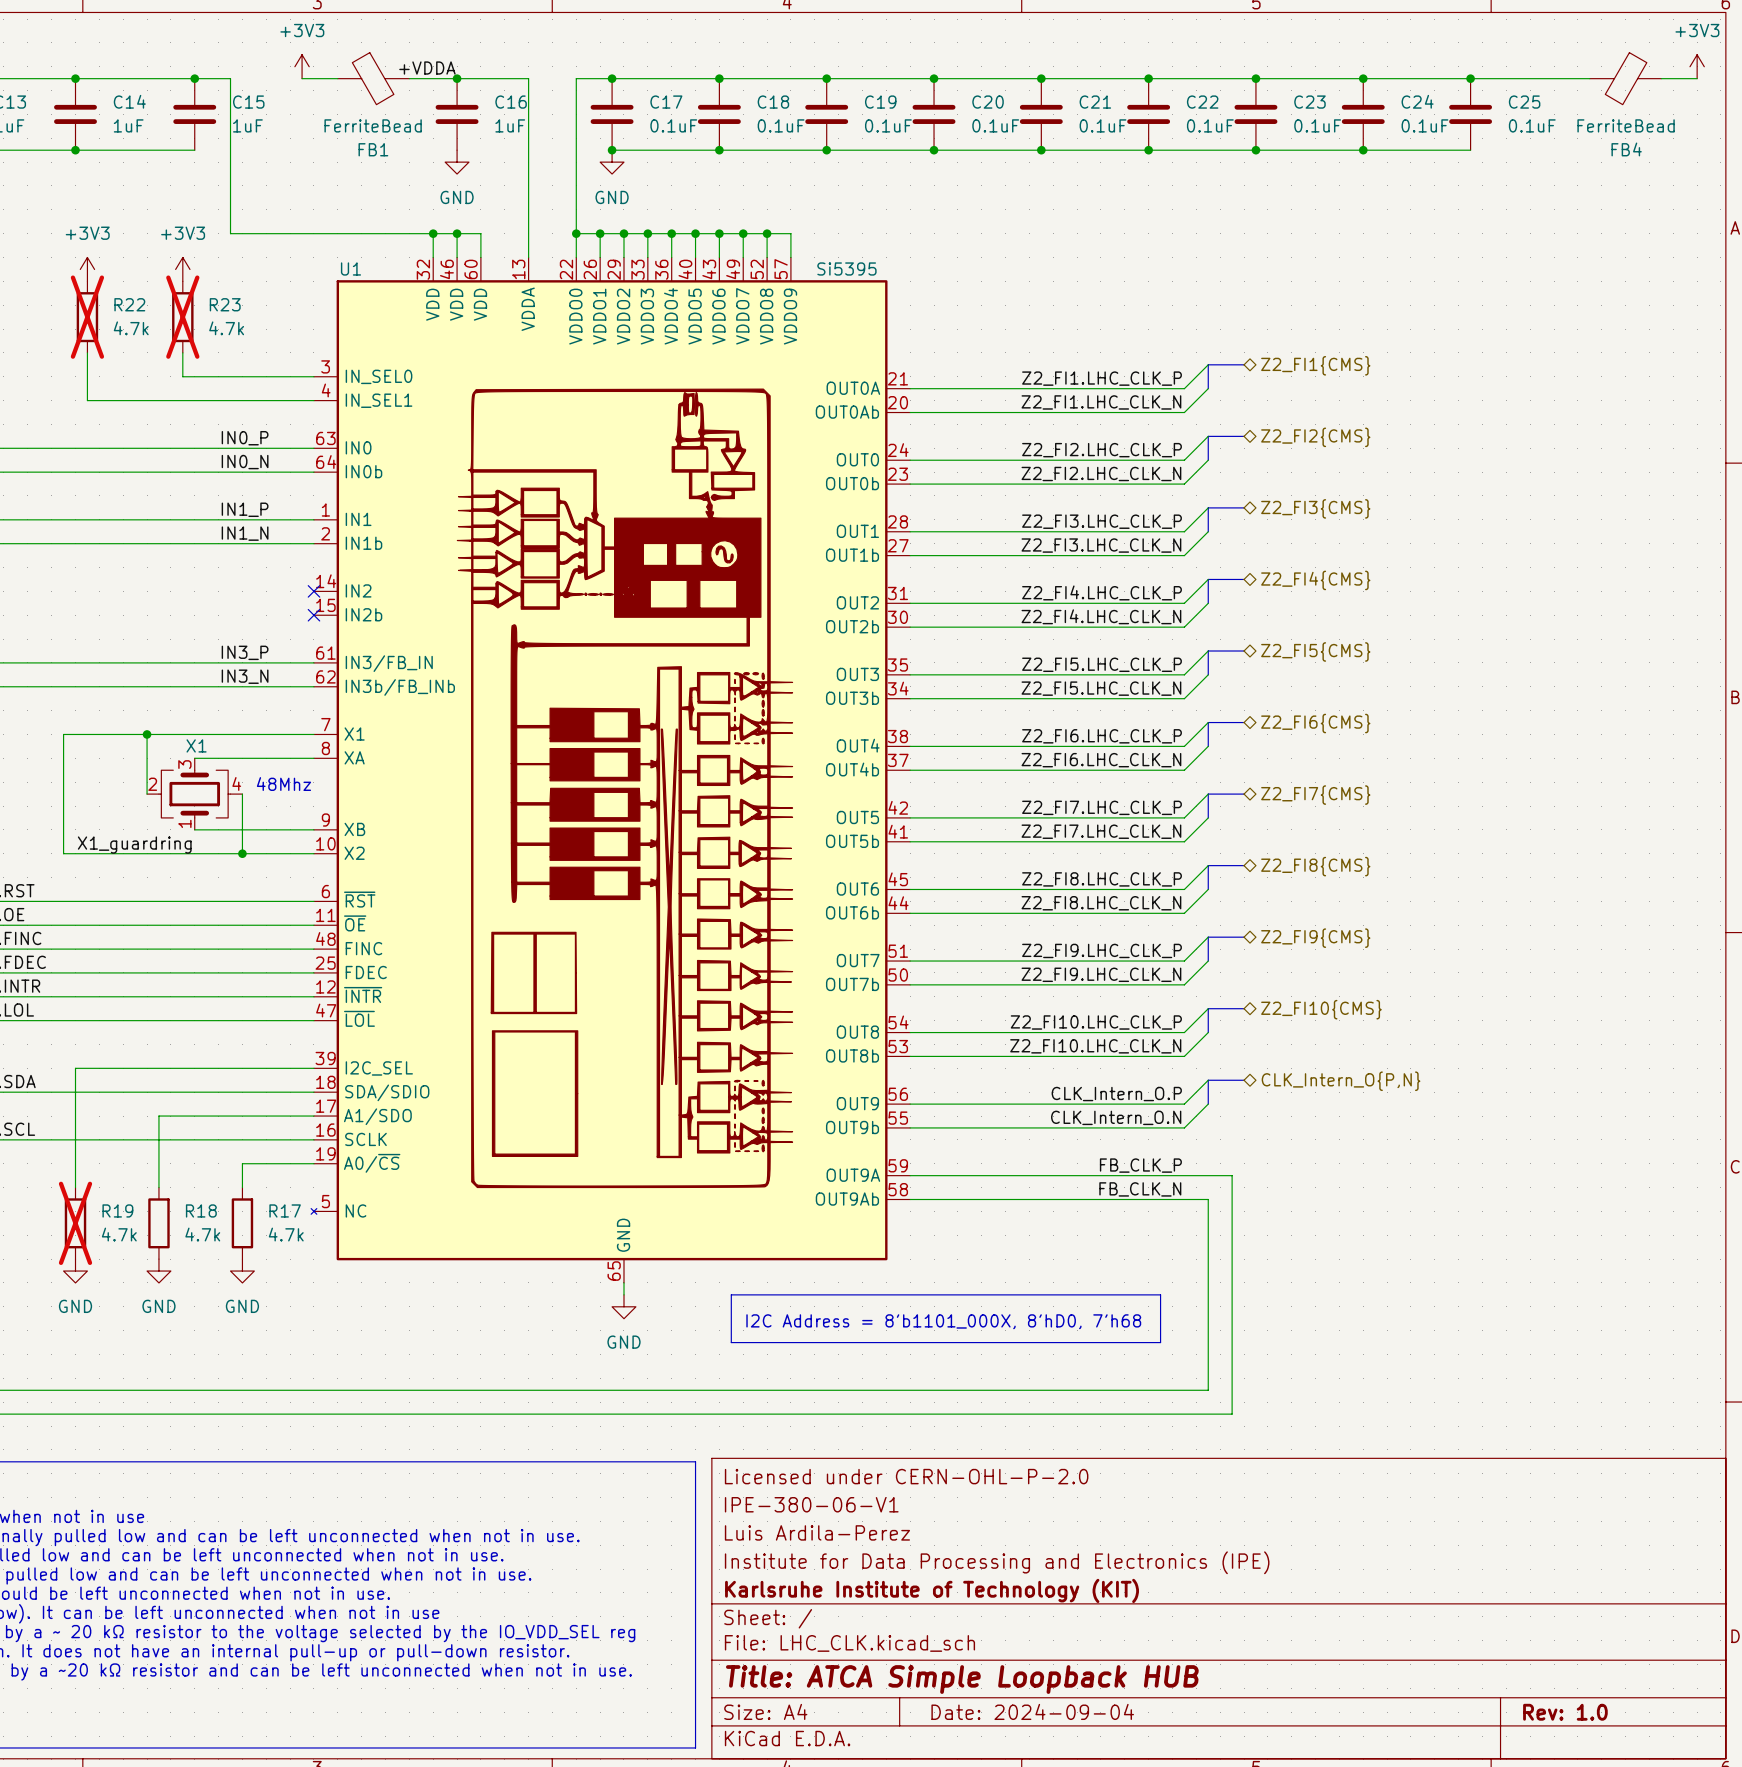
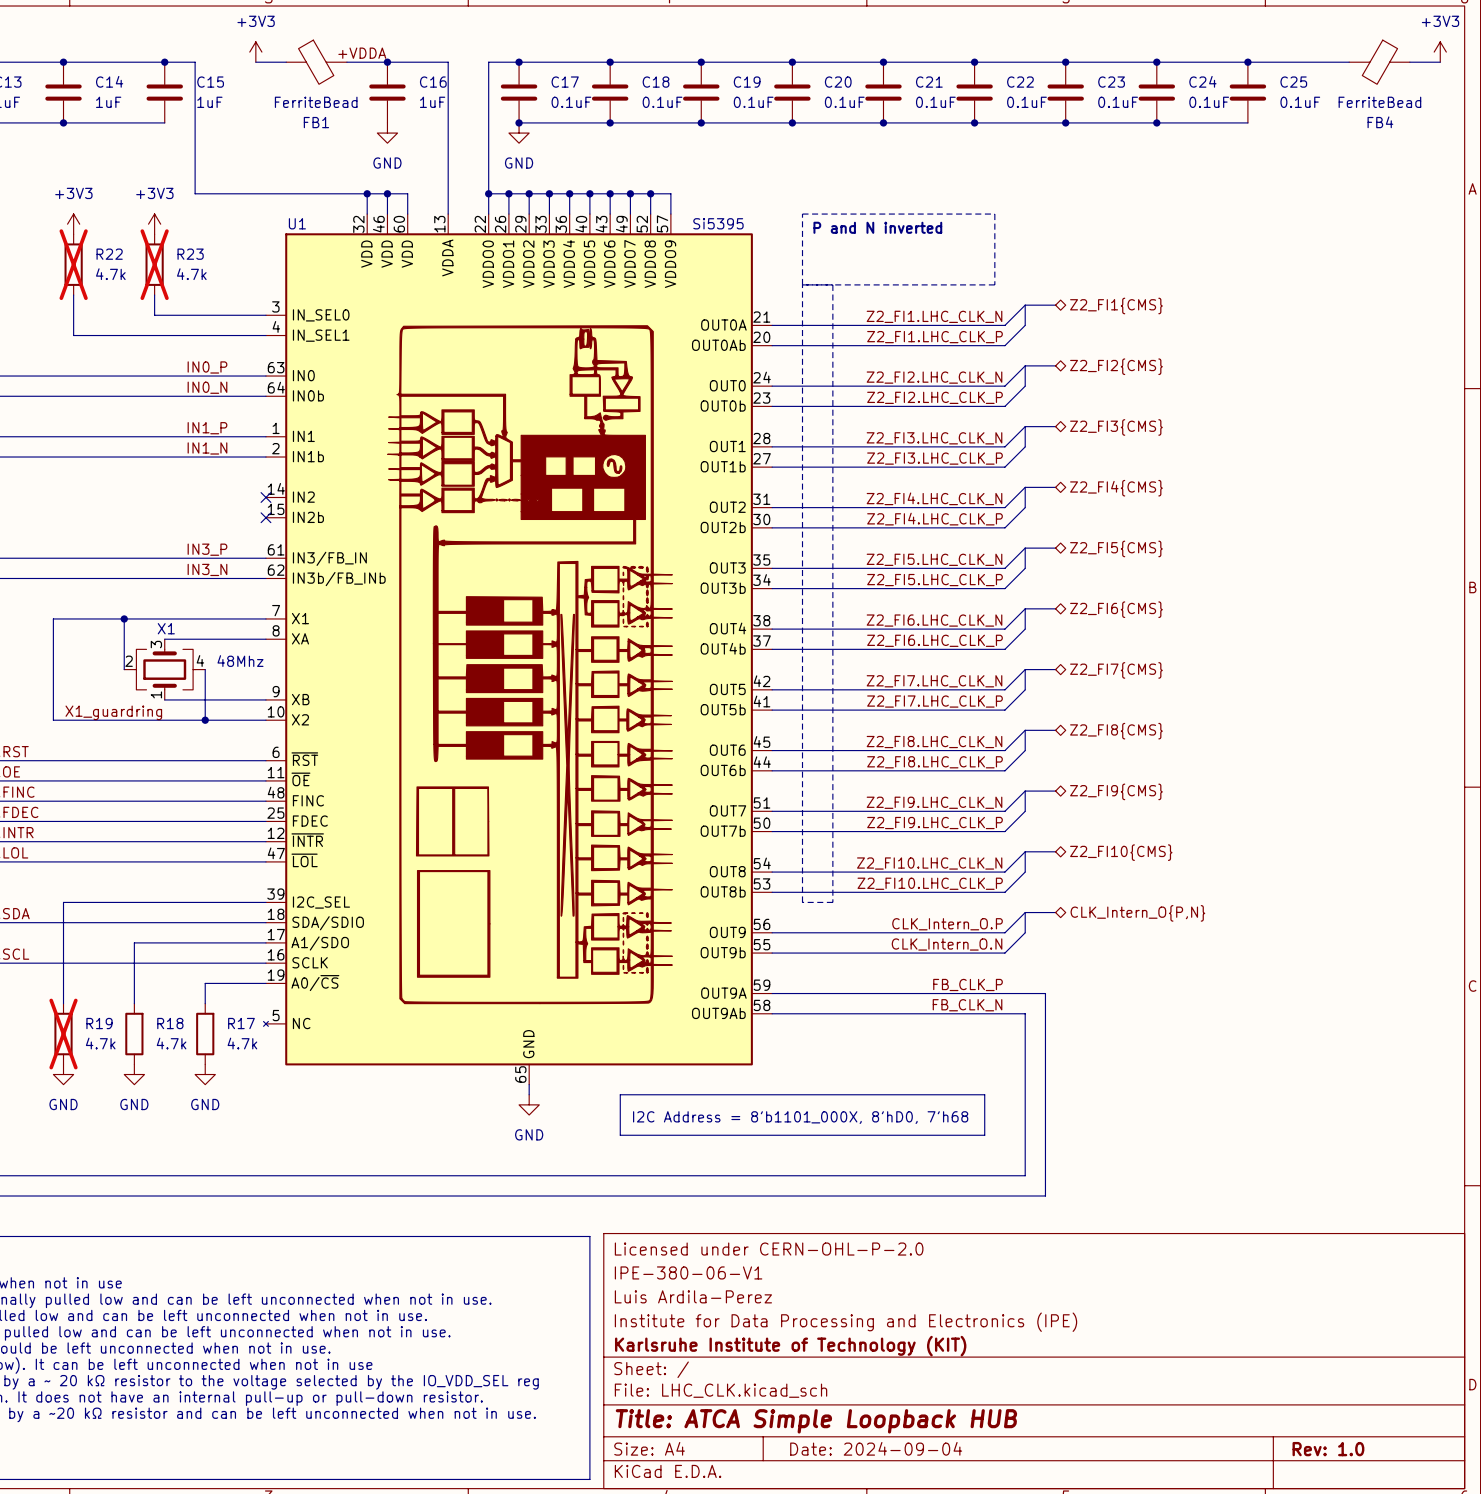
text: none -> P and N inverted (877, 227)
line: none -> (802, 284) (994, 284) (994, 214) (802, 214) (802, 902) (832, 902) (832, 284)
label: Z2_FI1.LHC_CLK_P (1101, 378) -> Z2_FI1.LHC_CLK_N (934, 316)
label: Z2_FI1.LHC_CLK_N (1101, 402) -> Z2_FI1.LHC_CLK_P (934, 337)
label: Z2_FI2.LHC_CLK_P (1101, 450) -> Z2_FI2.LHC_CLK_N (934, 377)
label: Z2_FI2.LHC_CLK_N (1101, 473) -> Z2_FI2.LHC_CLK_P (934, 397)
label: Z2_FI3.LHC_CLK_P (1101, 521) -> Z2_FI3.LHC_CLK_N (934, 438)
label: Z2_FI3.LHC_CLK_N (1101, 545) -> Z2_FI3.LHC_CLK_P (934, 458)
label: Z2_FI4.LHC_CLK_P (1101, 592) -> Z2_FI4.LHC_CLK_N (934, 498)
label: Z2_FI4.LHC_CLK_N (1101, 616) -> Z2_FI4.LHC_CLK_P (934, 519)
label: Z2_FI5.LHC_CLK_P (1101, 664) -> Z2_FI5.LHC_CLK_N (934, 559)
label: Z2_FI5.LHC_CLK_N (1101, 688) -> Z2_FI5.LHC_CLK_P (934, 580)
label: Z2_FI6.LHC_CLK_P (1101, 736) -> Z2_FI6.LHC_CLK_N (934, 620)
label: Z2_FI6.LHC_CLK_N (1101, 760) -> Z2_FI6.LHC_CLK_P (934, 640)
label: Z2_FI7.LHC_CLK_P (1101, 807) -> Z2_FI7.LHC_CLK_N (934, 681)
label: Z2_FI7.LHC_CLK_N (1101, 831) -> Z2_FI7.LHC_CLK_P (934, 701)
label: Z2_FI8.LHC_CLK_P (1101, 879) -> Z2_FI8.LHC_CLK_N (934, 742)
label: Z2_FI8.LHC_CLK_N (1101, 903) -> Z2_FI8.LHC_CLK_P (934, 762)
label: Z2_FI9.LHC_CLK_P (1101, 950) -> Z2_FI9.LHC_CLK_N (934, 802)
label: Z2_FI9.LHC_CLK_N (1101, 974) -> Z2_FI9.LHC_CLK_P (934, 823)
label: Z2_FI10.LHC_CLK_P (1096, 1022) -> Z2_FI10.LHC_CLK_N (929, 863)
label: Z2_FI10.LHC_CLK_N (1095, 1046) -> Z2_FI10.LHC_CLK_P (930, 883)

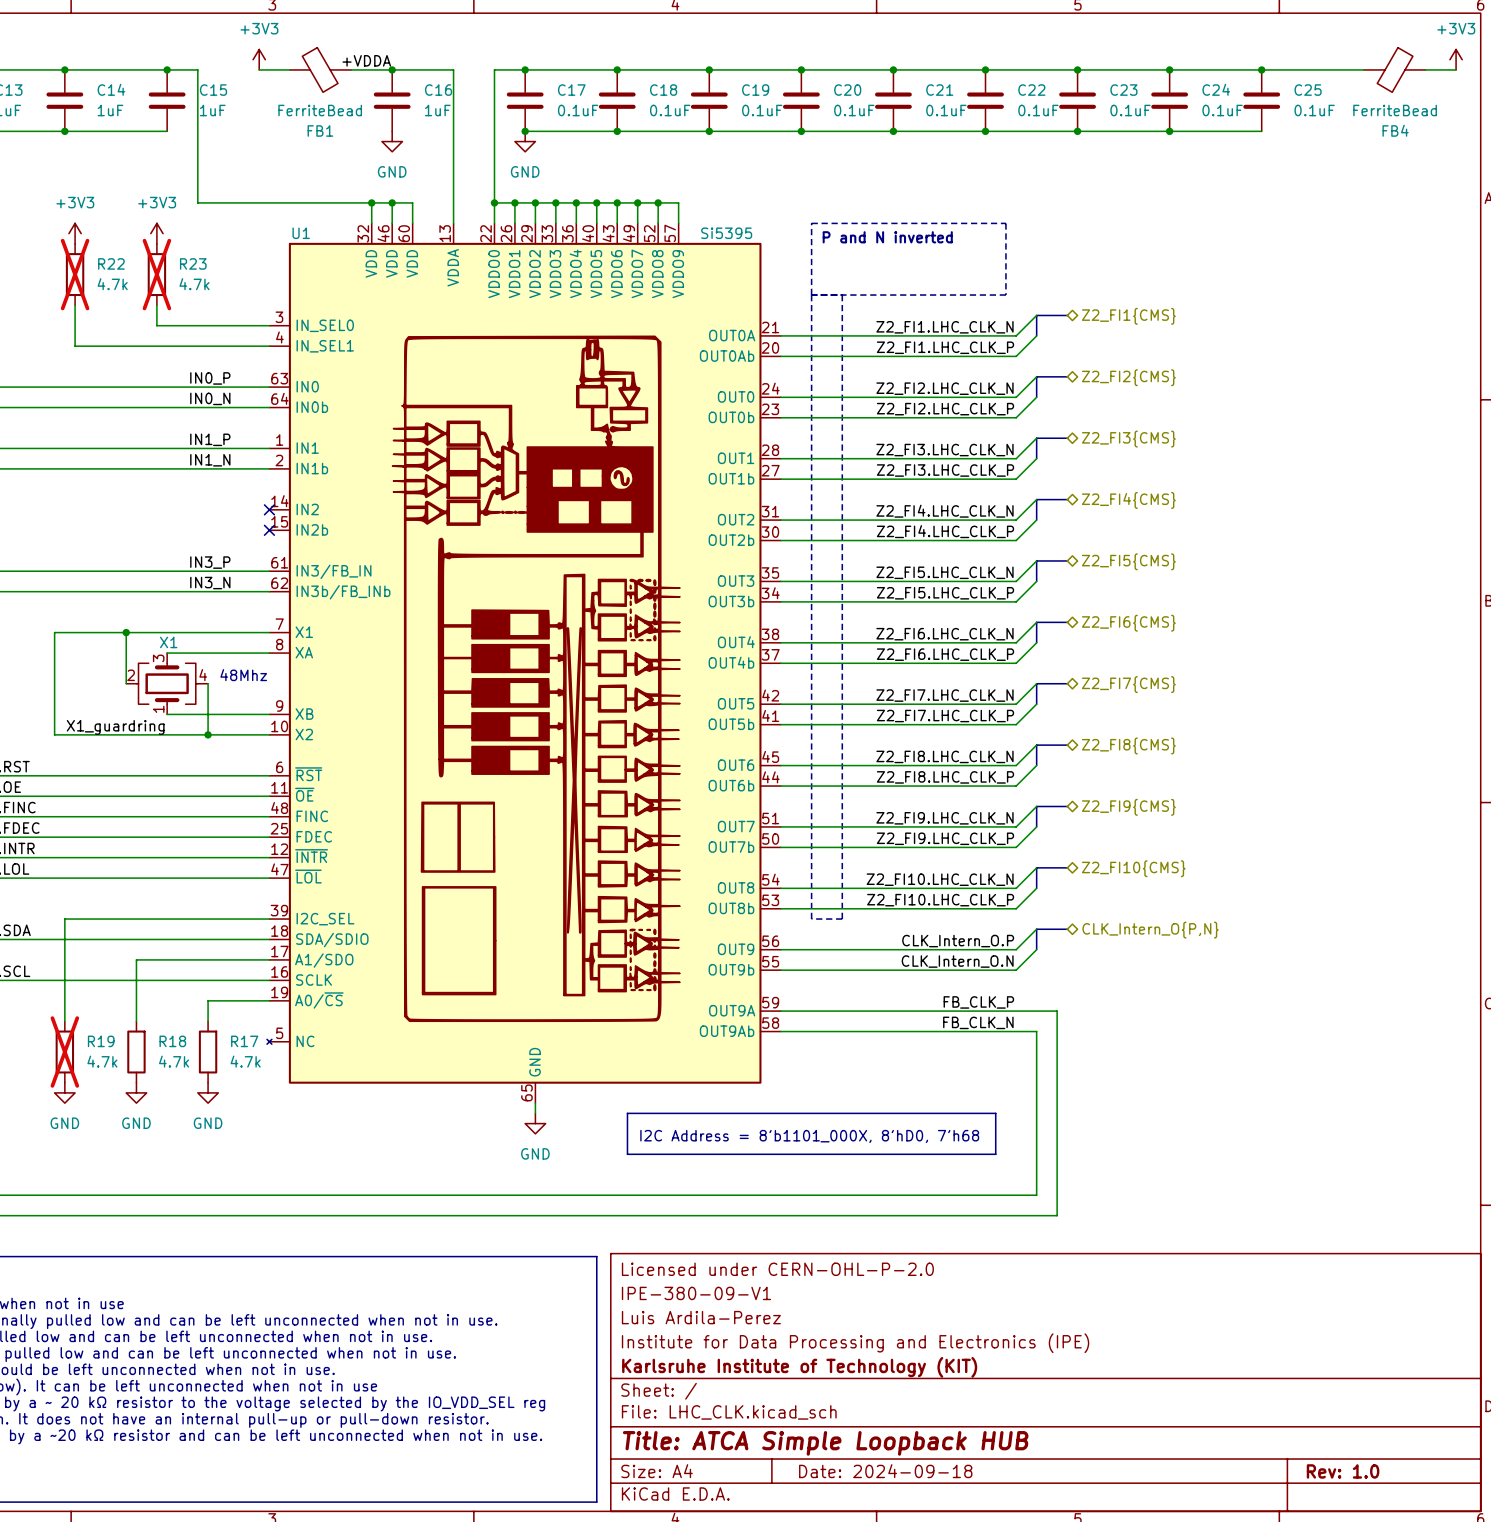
title block: IPE-380-06-V1 (688, 1272) -> IPE-380-09-V1 (696, 1293)
title block: Date: 2024-09-04 (876, 1448) -> Date: 2024-09-18 (885, 1471)

